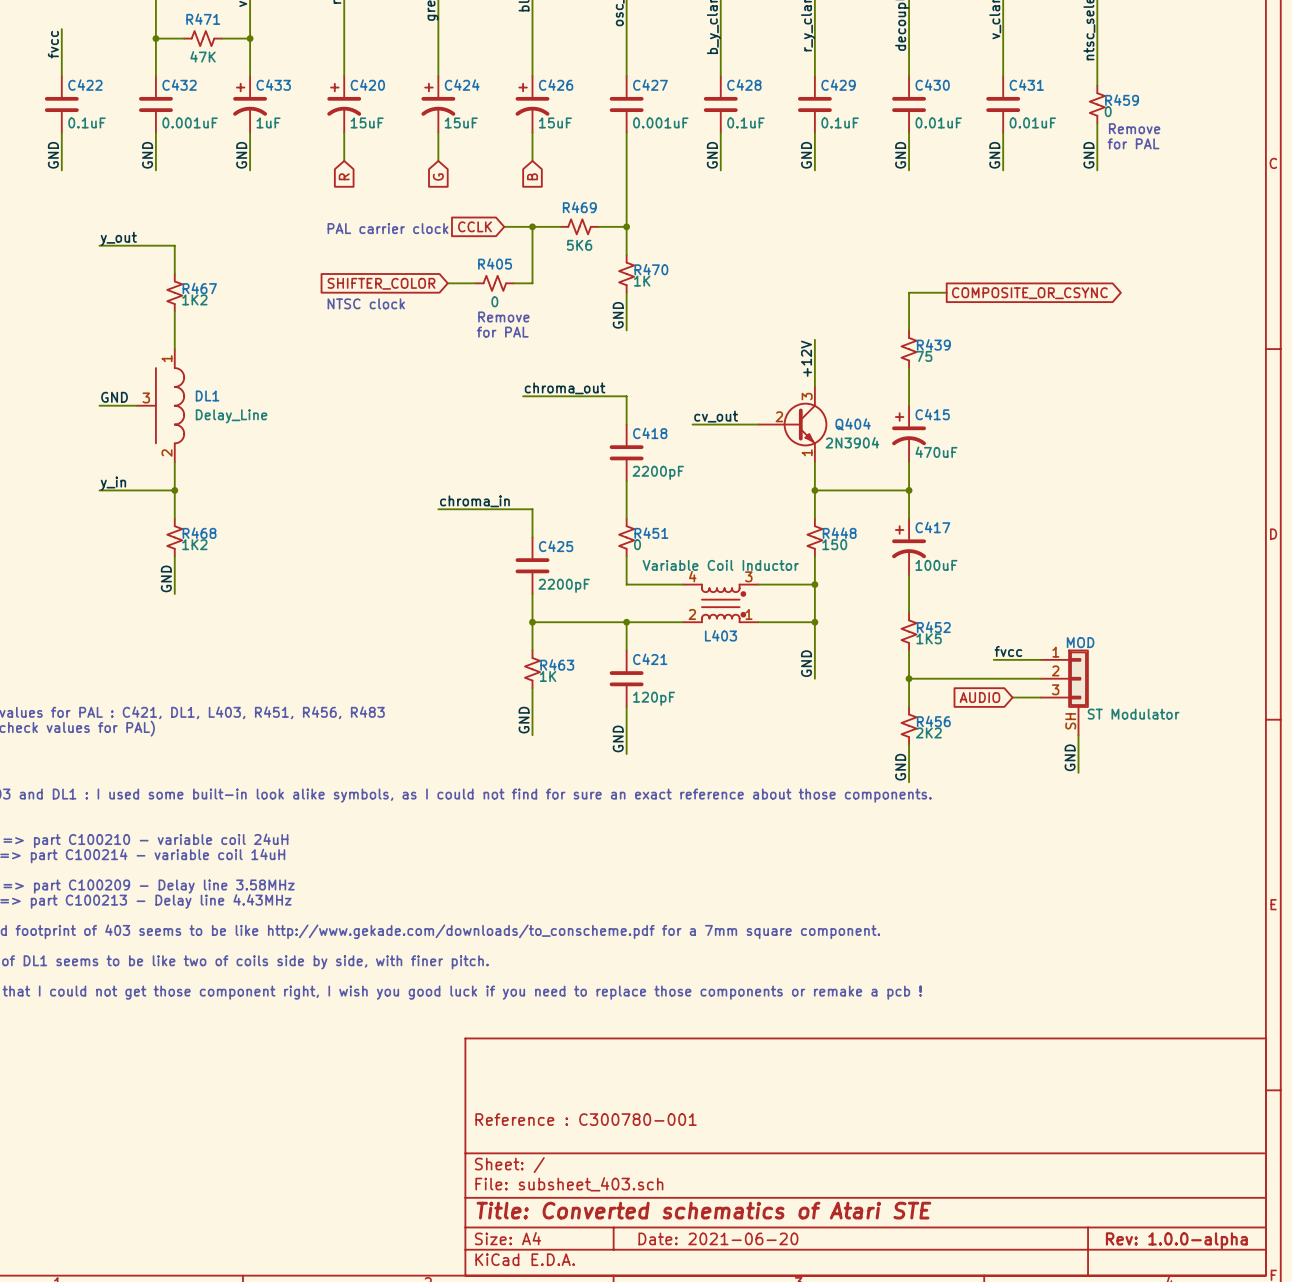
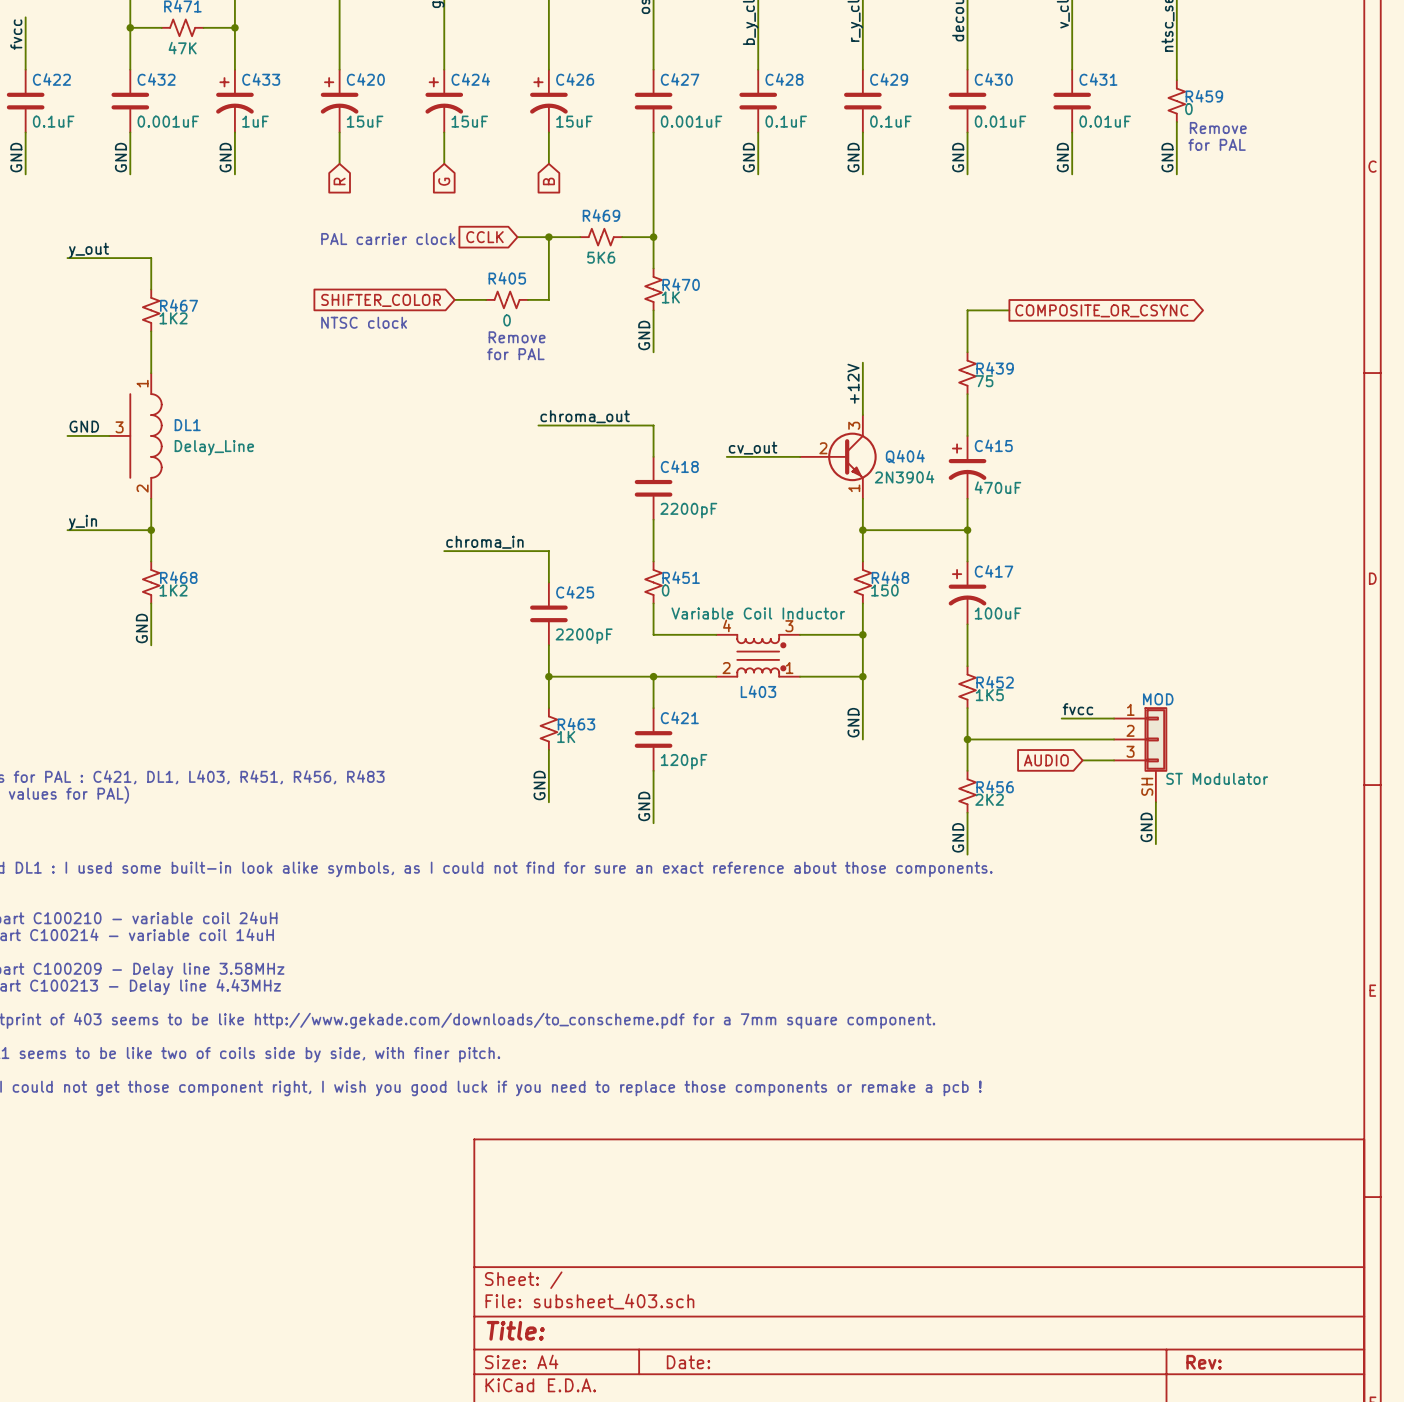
title block: Reference : C300780-001 (586, 1119) -> none
title block: Title: Converted schematics of Atari STE (703, 1210) -> Title: (515, 1330)
title block: Date: 2021-06-20 (718, 1238) -> Date: (688, 1362)
title block: Rev: 1.0.0-alpha (1176, 1240) -> Rev: (1204, 1362)

